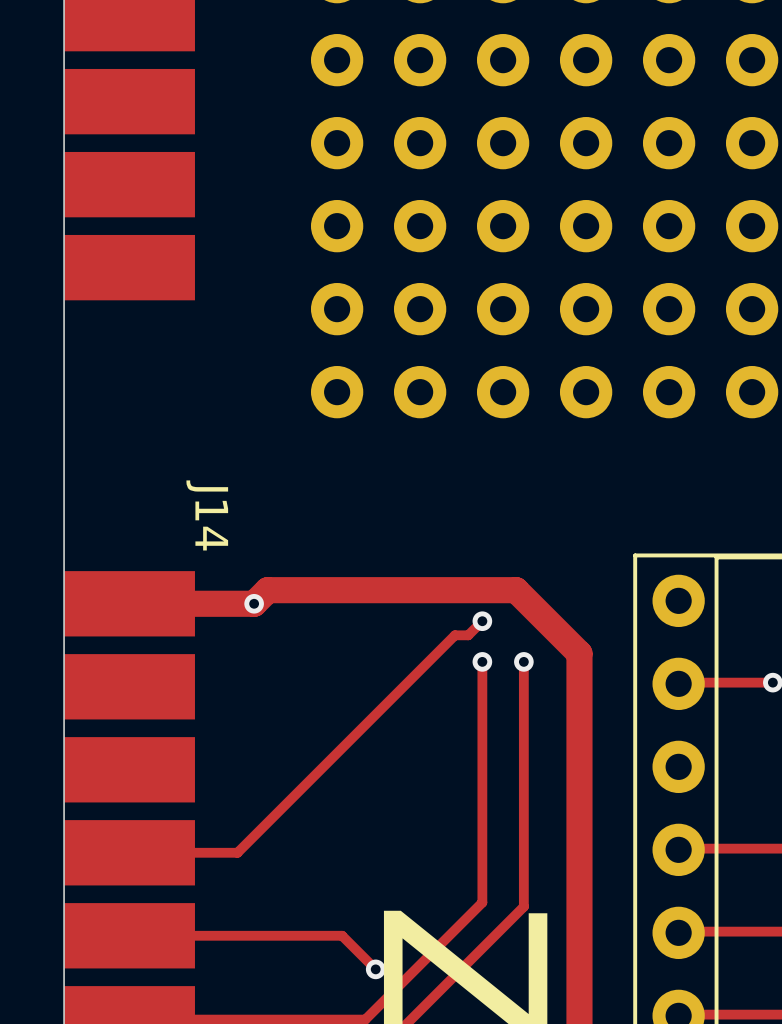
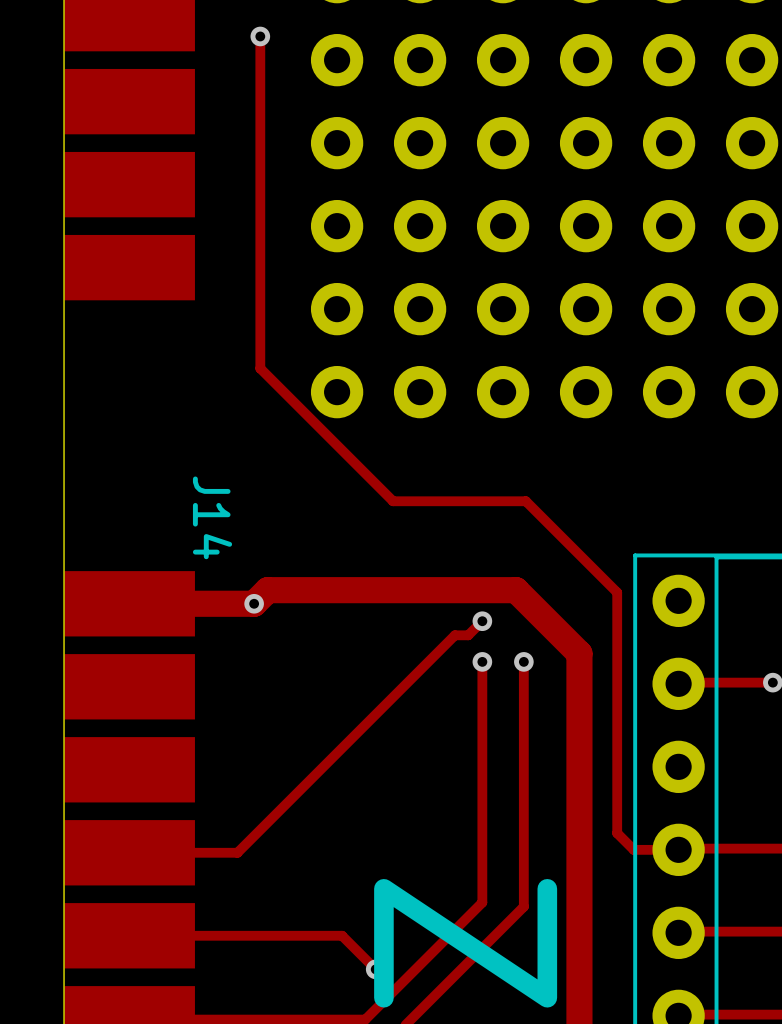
track: none -> (260, 36) (260, 368) (393, 501) (525, 501) (617, 592) (617, 833) (633, 849) (678, 849)
via: none -> (260, 36)

